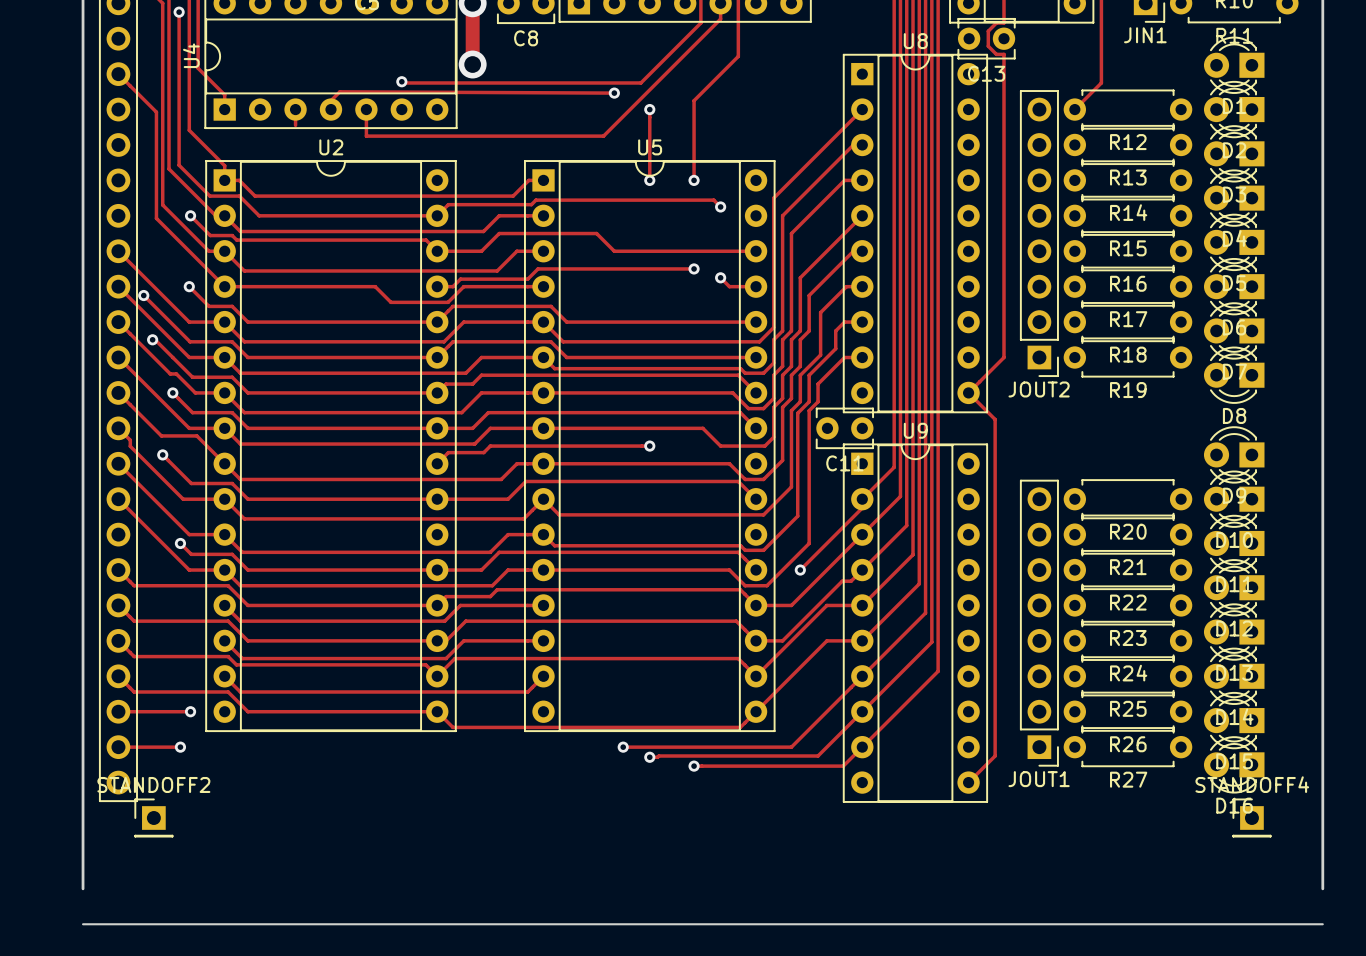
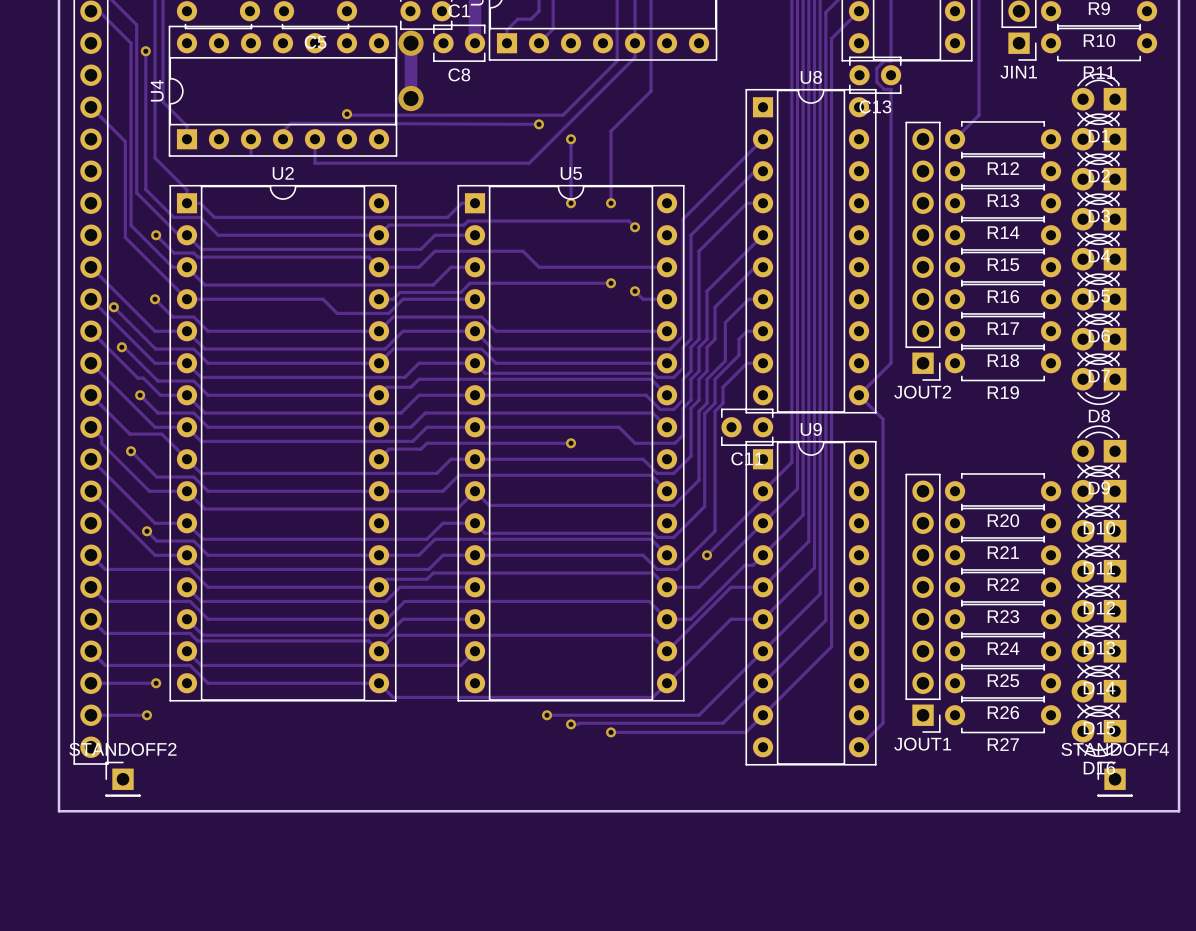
board edge: (83, 853) (83, 888) -> (59, 811) (1179, 811)
board edge: (1322, 853) (1322, 888) -> none
board edge: (83, 924) (1322, 924) -> none

